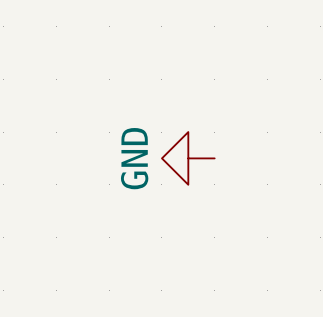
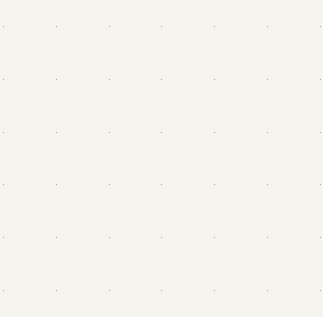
power symbol: GND (188, 158) -> none

